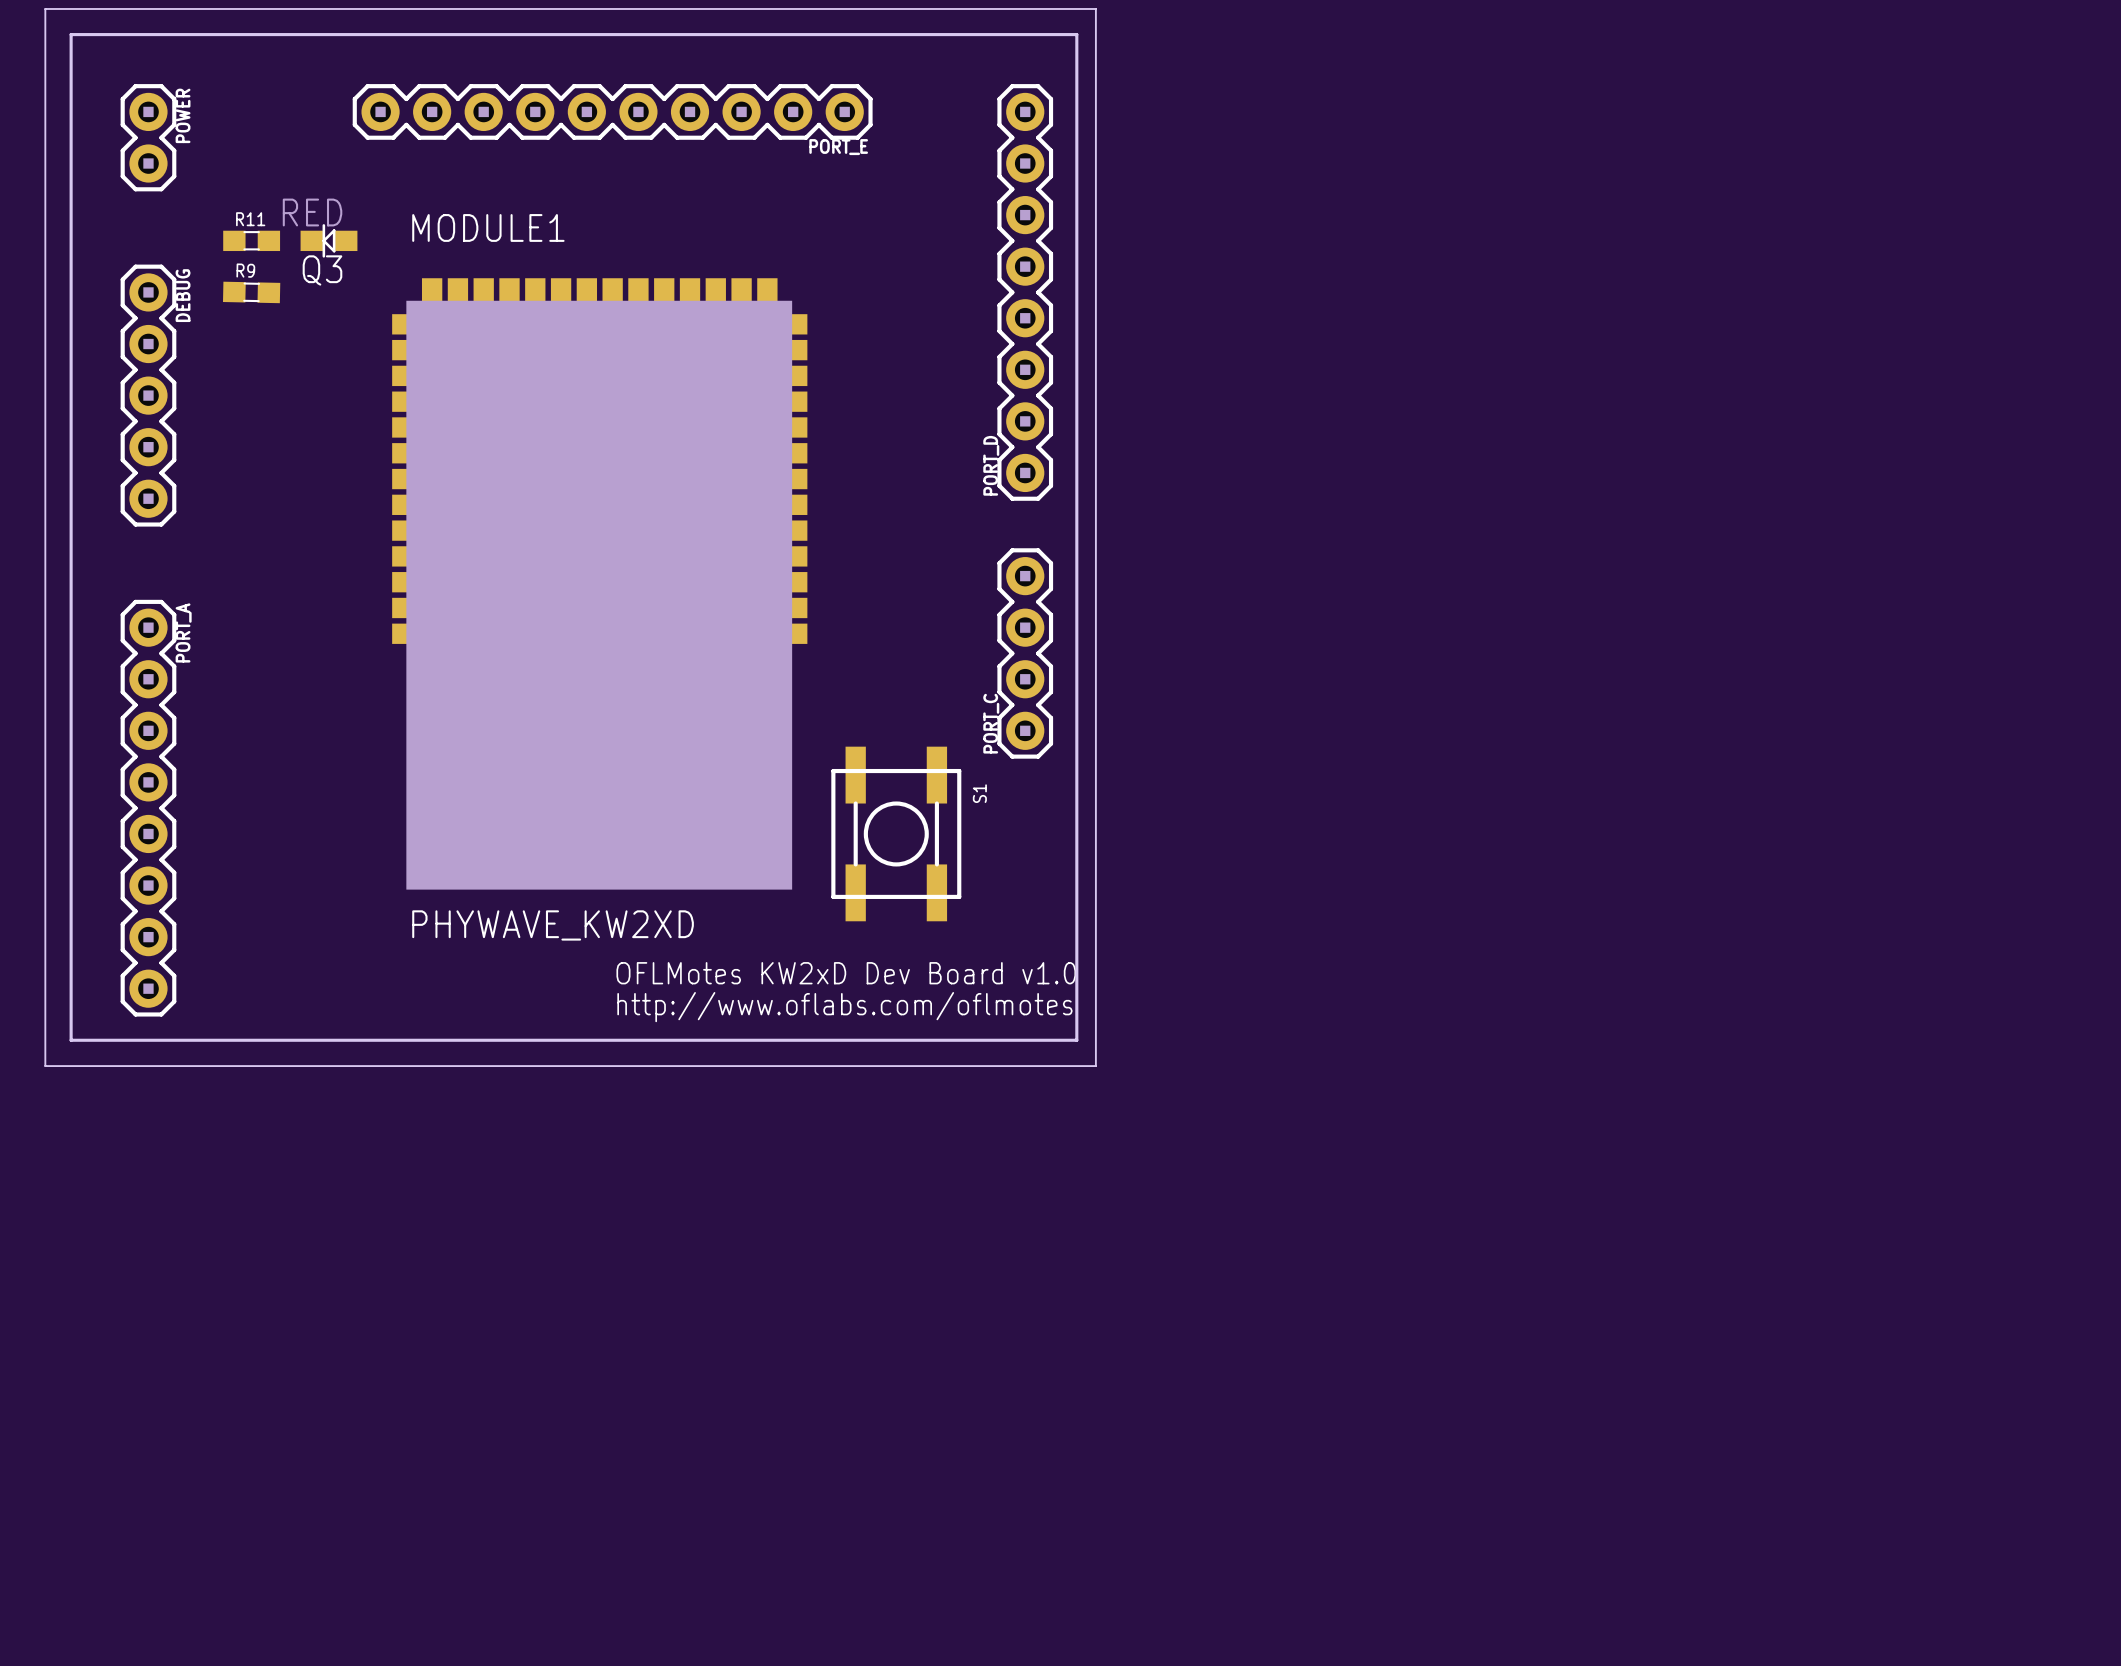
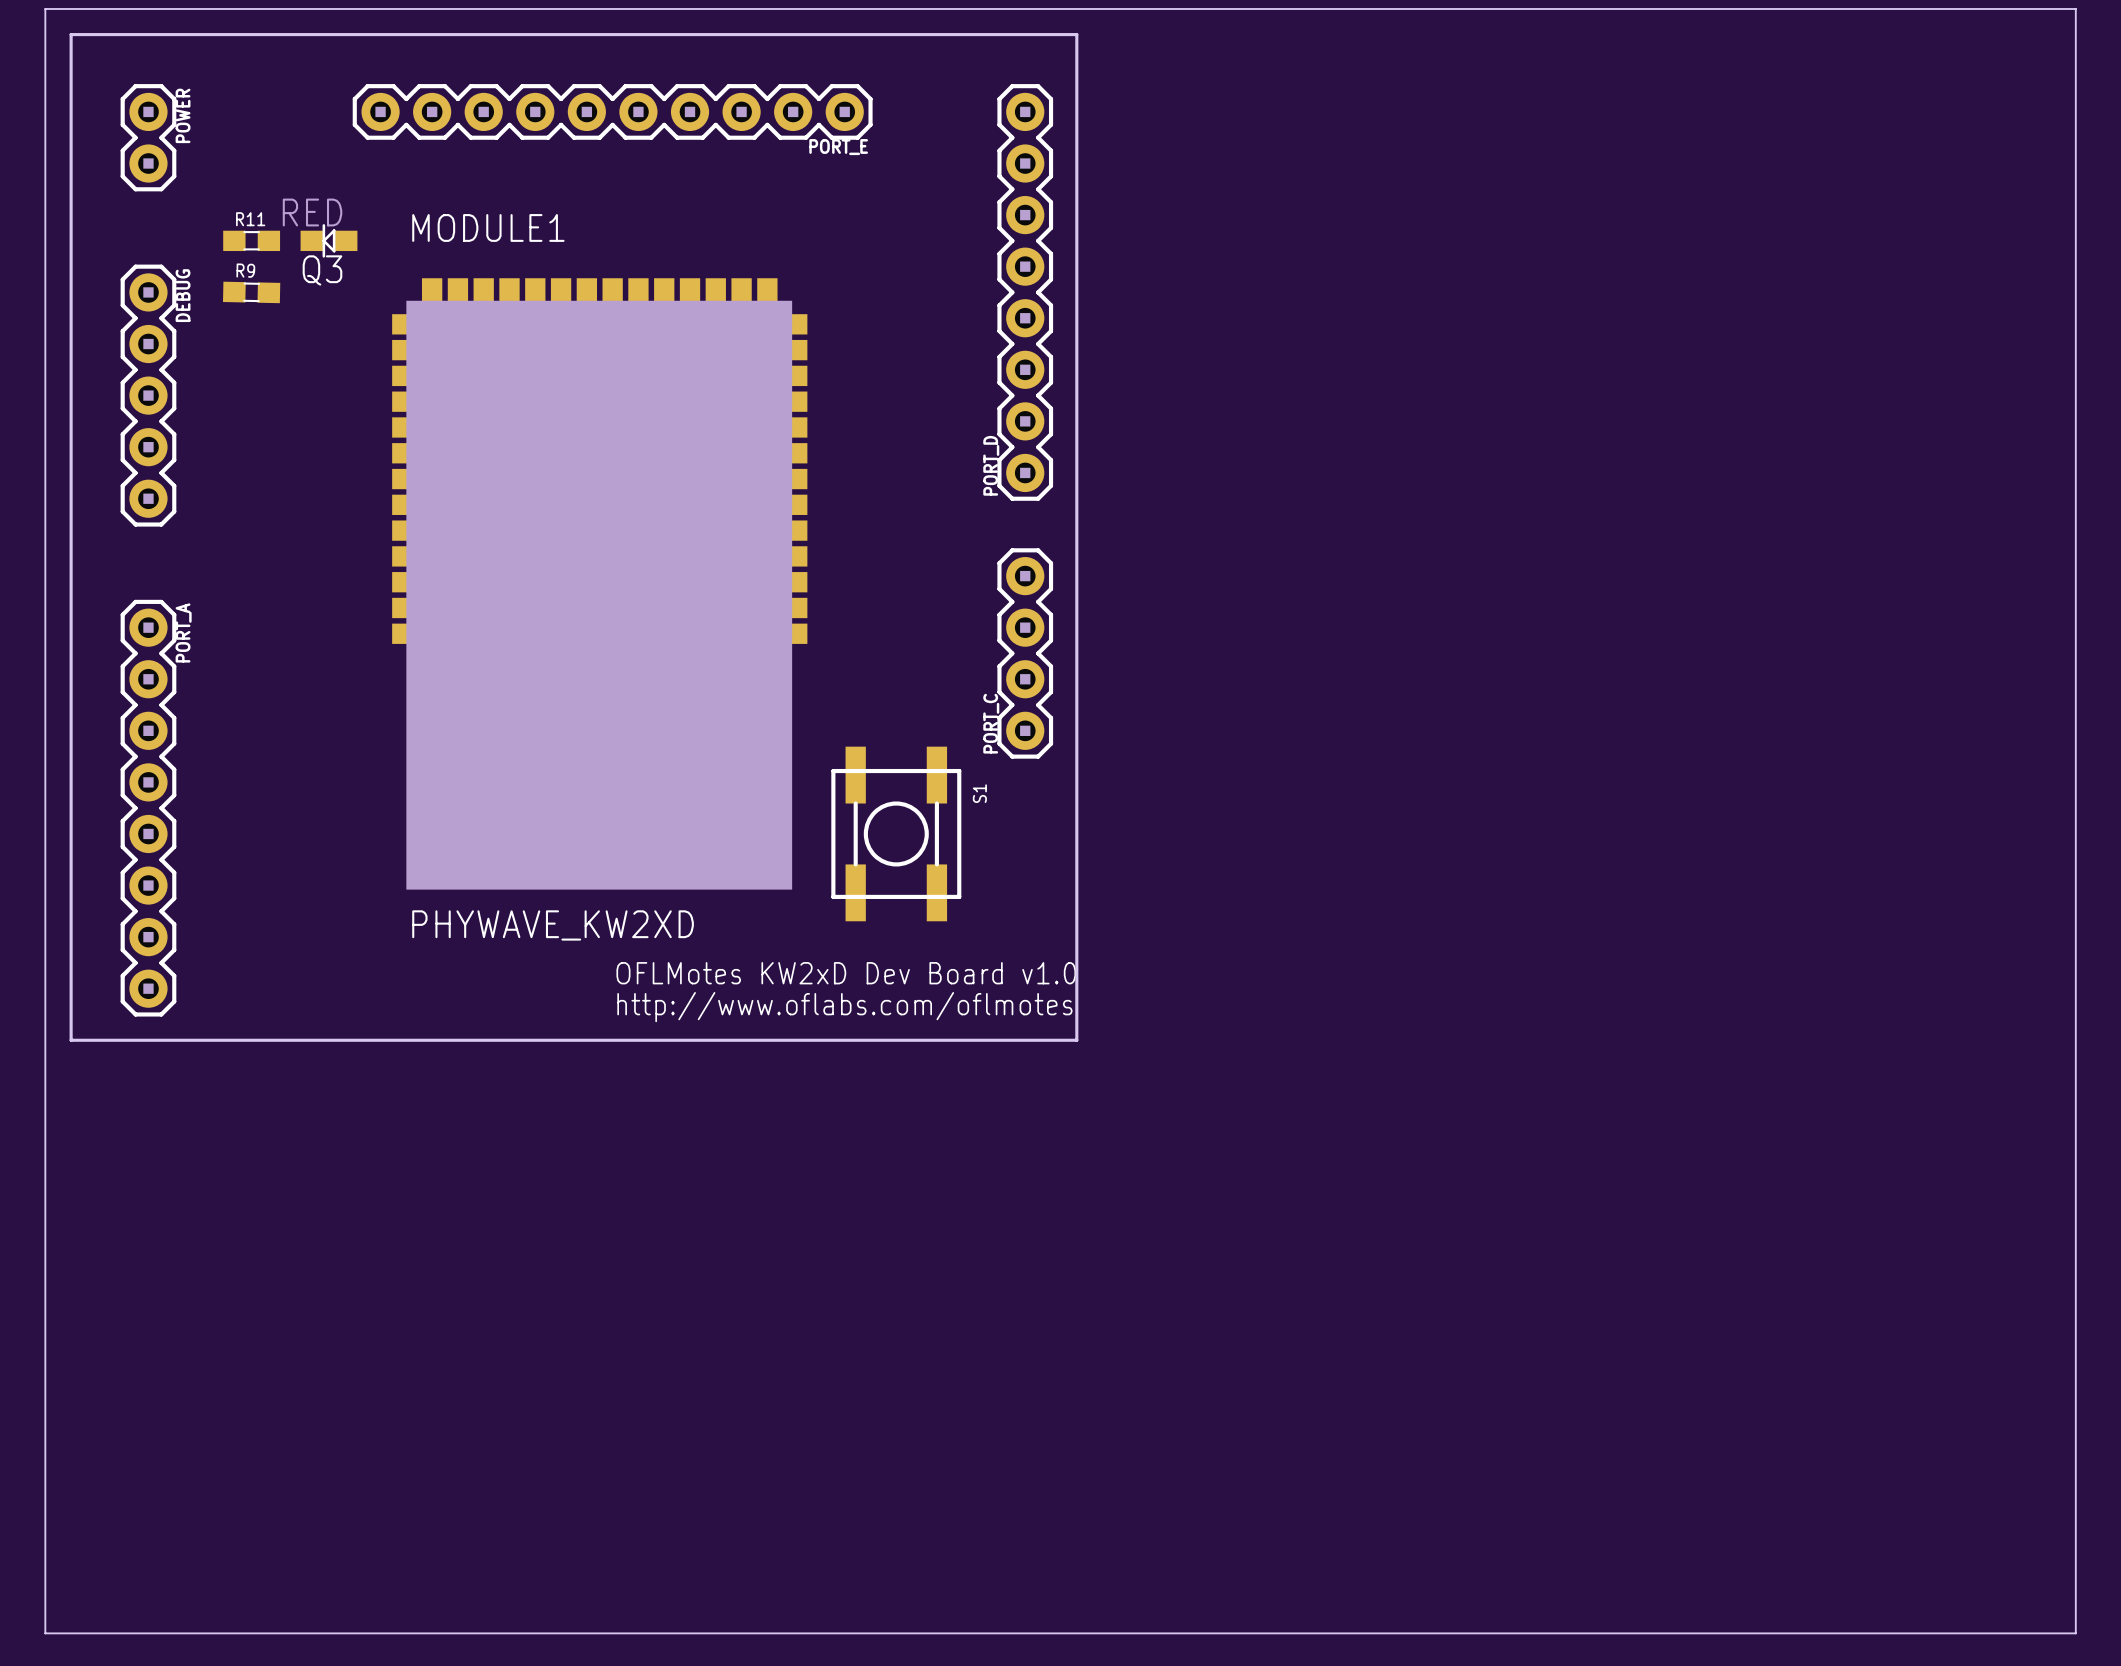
board edge: (1095, 8) (1095, 1066) (45, 1066) -> (1095, 8) (2075, 8) (2075, 1633) (45, 1633) (45, 1066)

